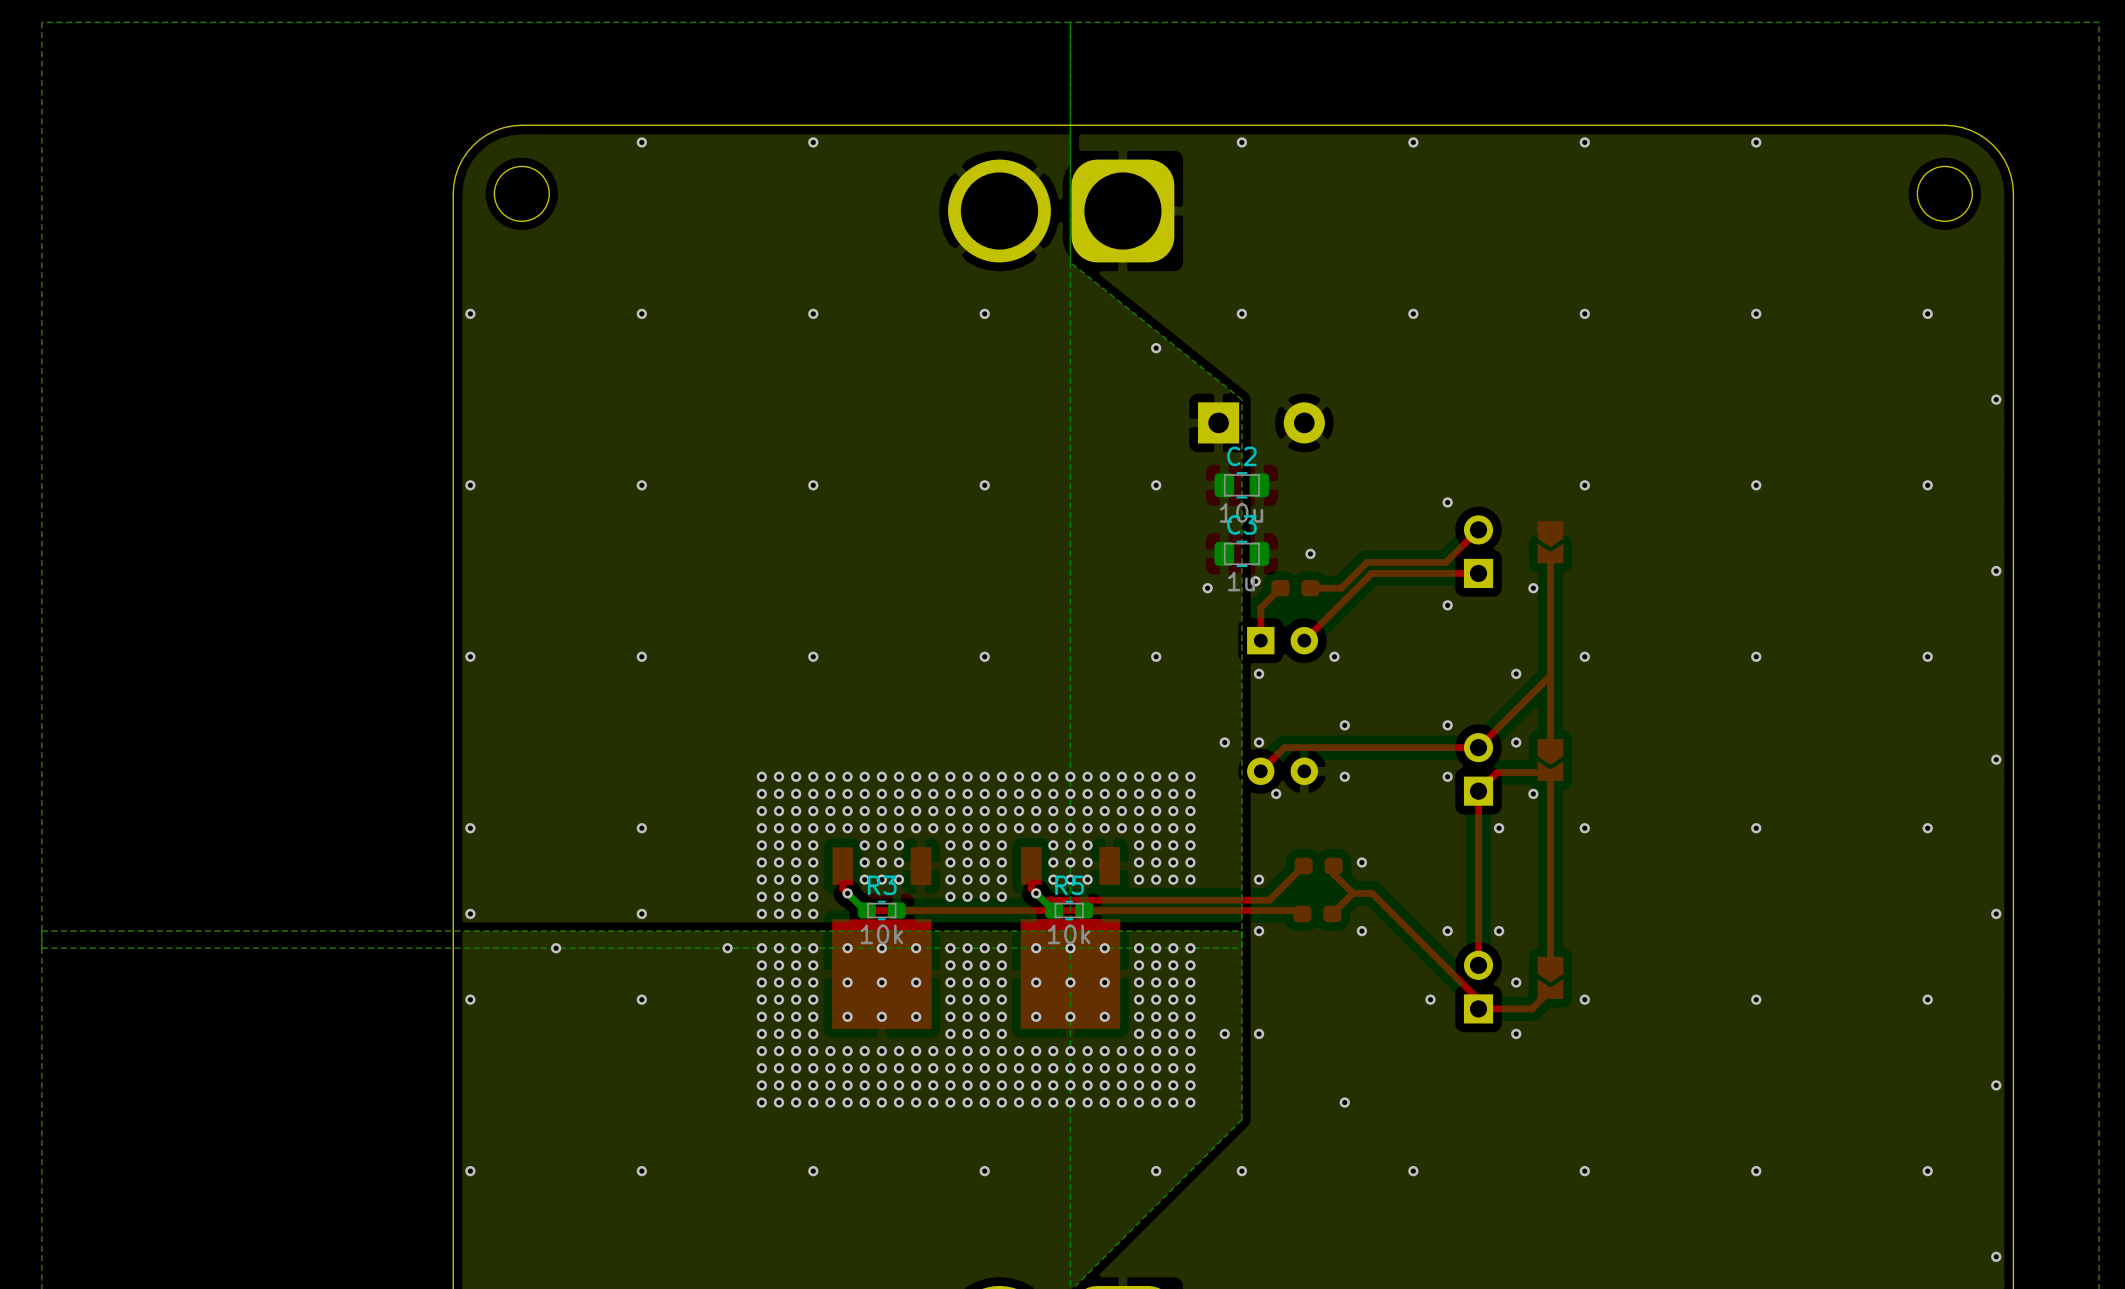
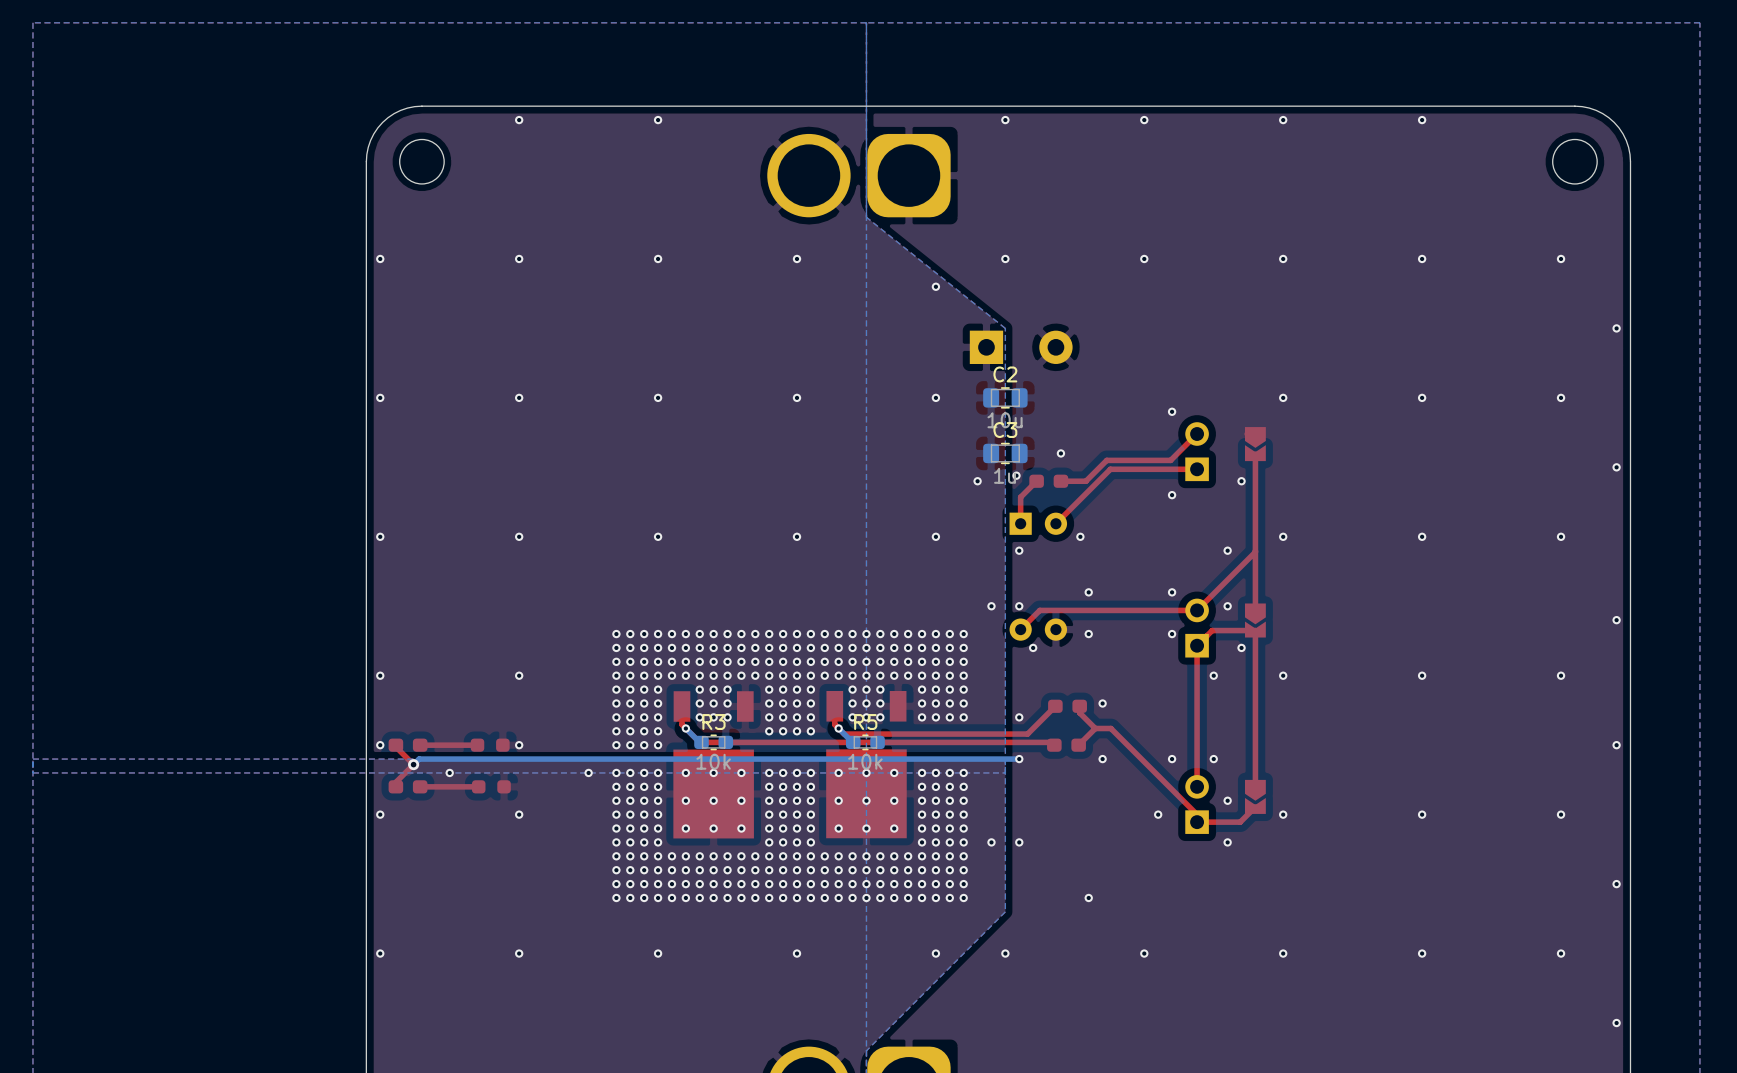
top track: none -> (395, 745) (413, 764) (395, 782) (395, 786)
part: none -> (408, 745)
top track: none -> (477, 745) (420, 745)
part: none -> (490, 745)
bottom track: none -> (1019, 759) (419, 759) (413, 764)
via: none -> (413, 764)
part: none -> (408, 786)
top track: none -> (478, 786) (420, 786)
part: none -> (491, 786)

